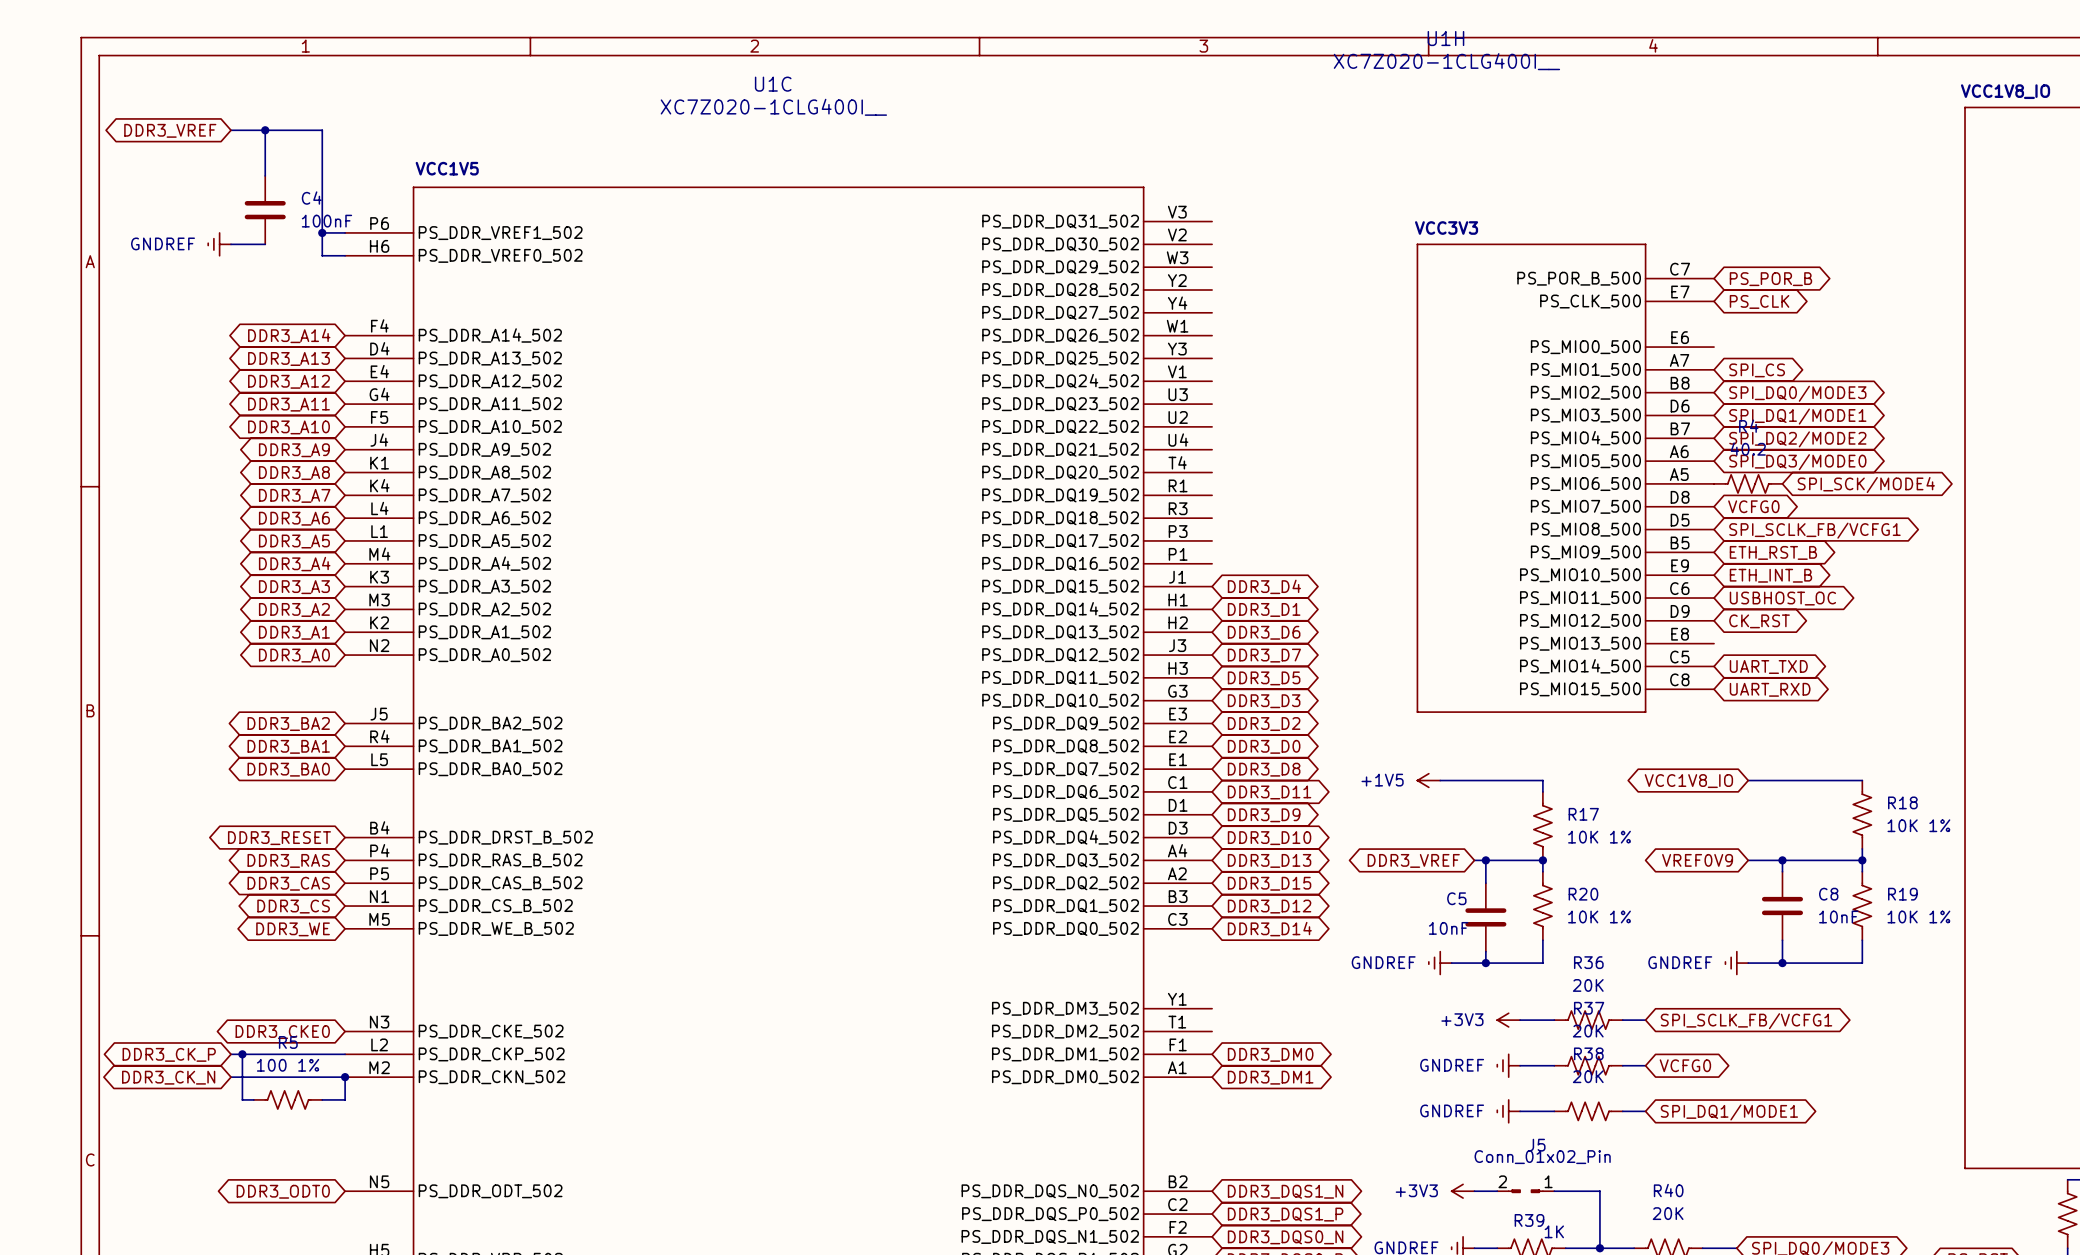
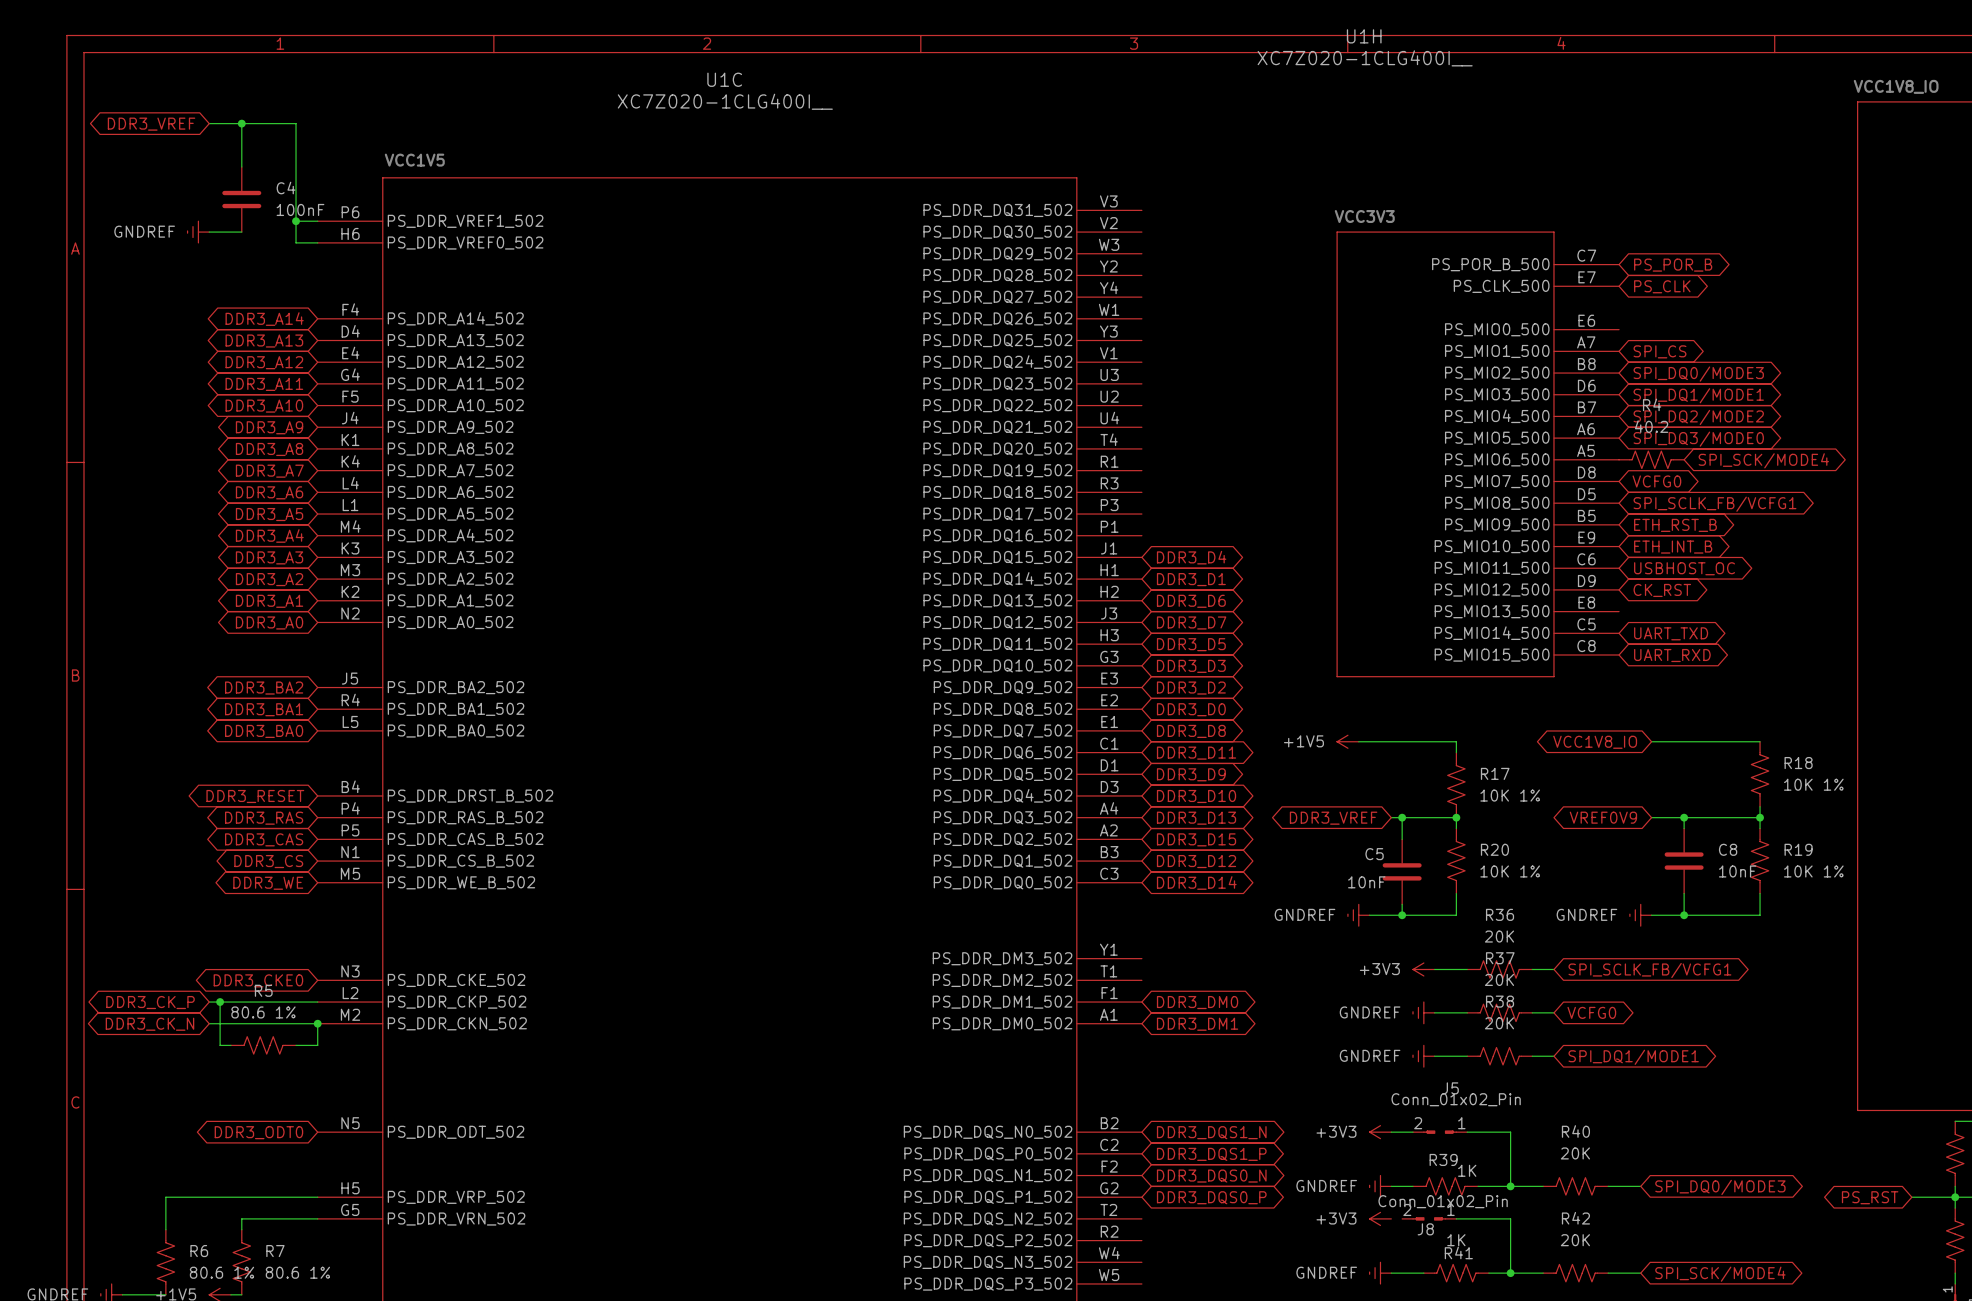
R5 value: 100 1% (288, 1065) -> 80.6 1% (263, 1012)

